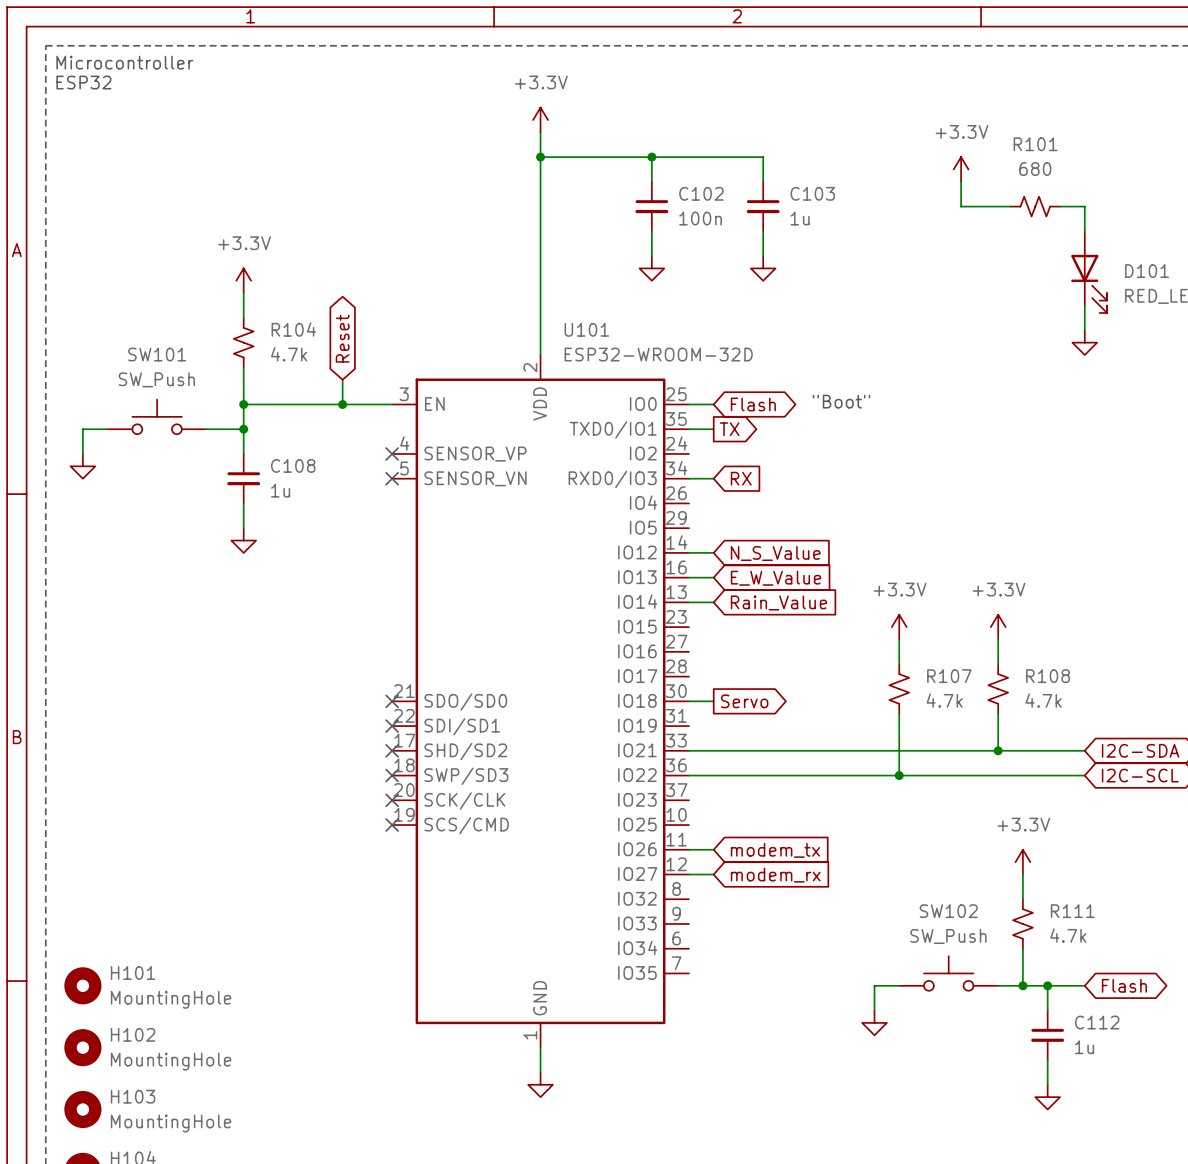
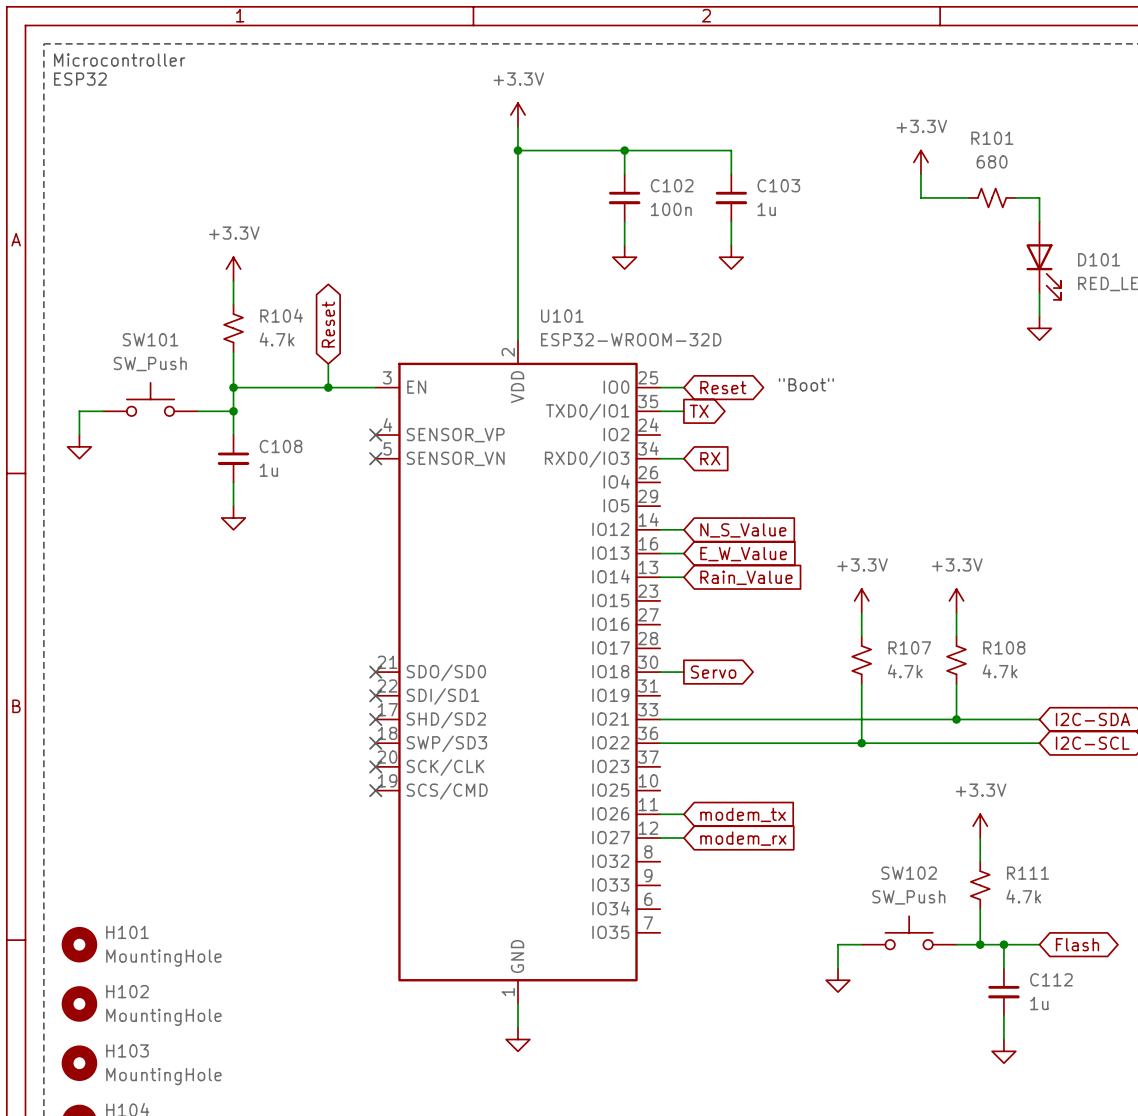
global label: Flash (753, 404) -> Reset (723, 387)

